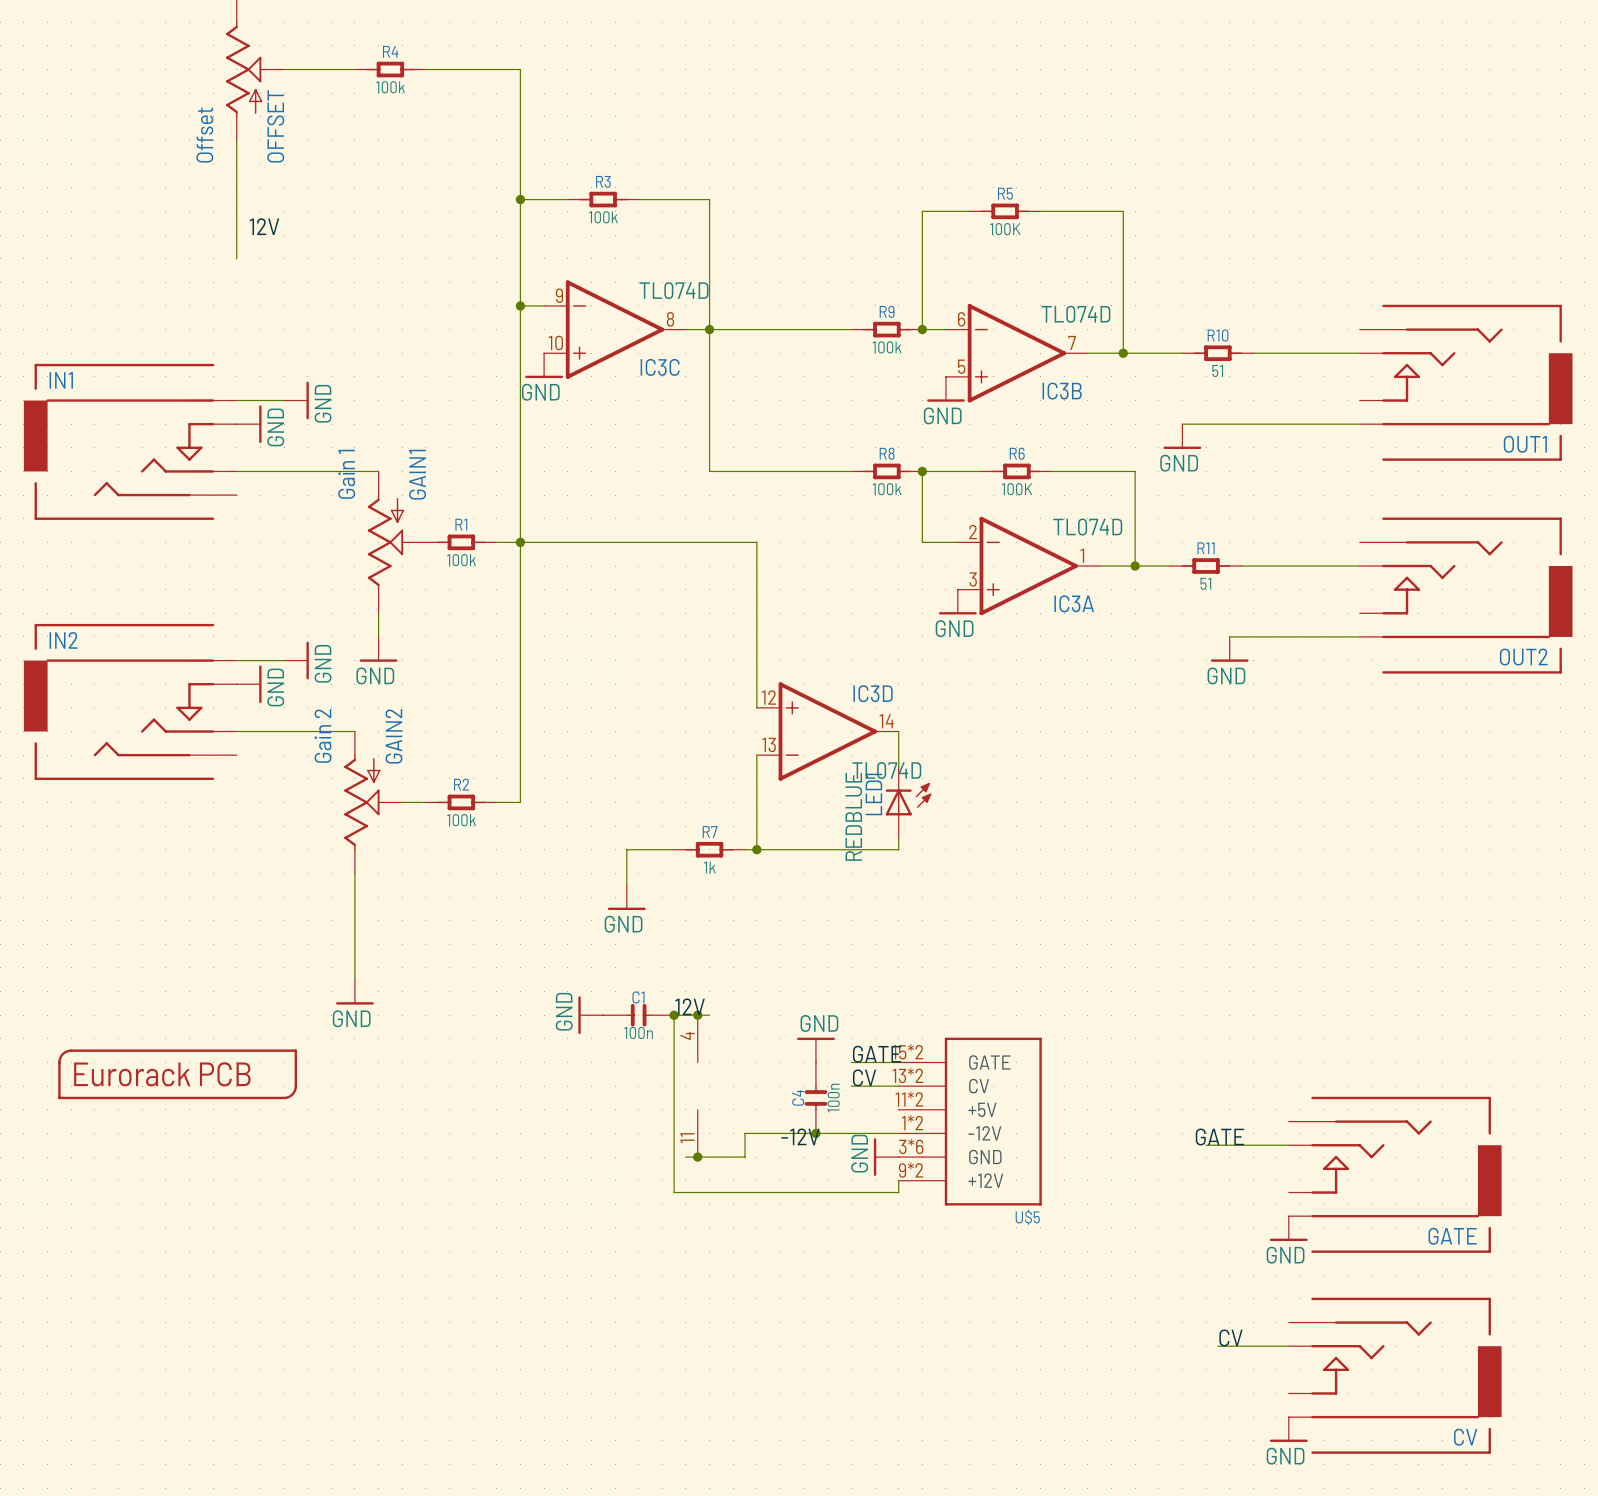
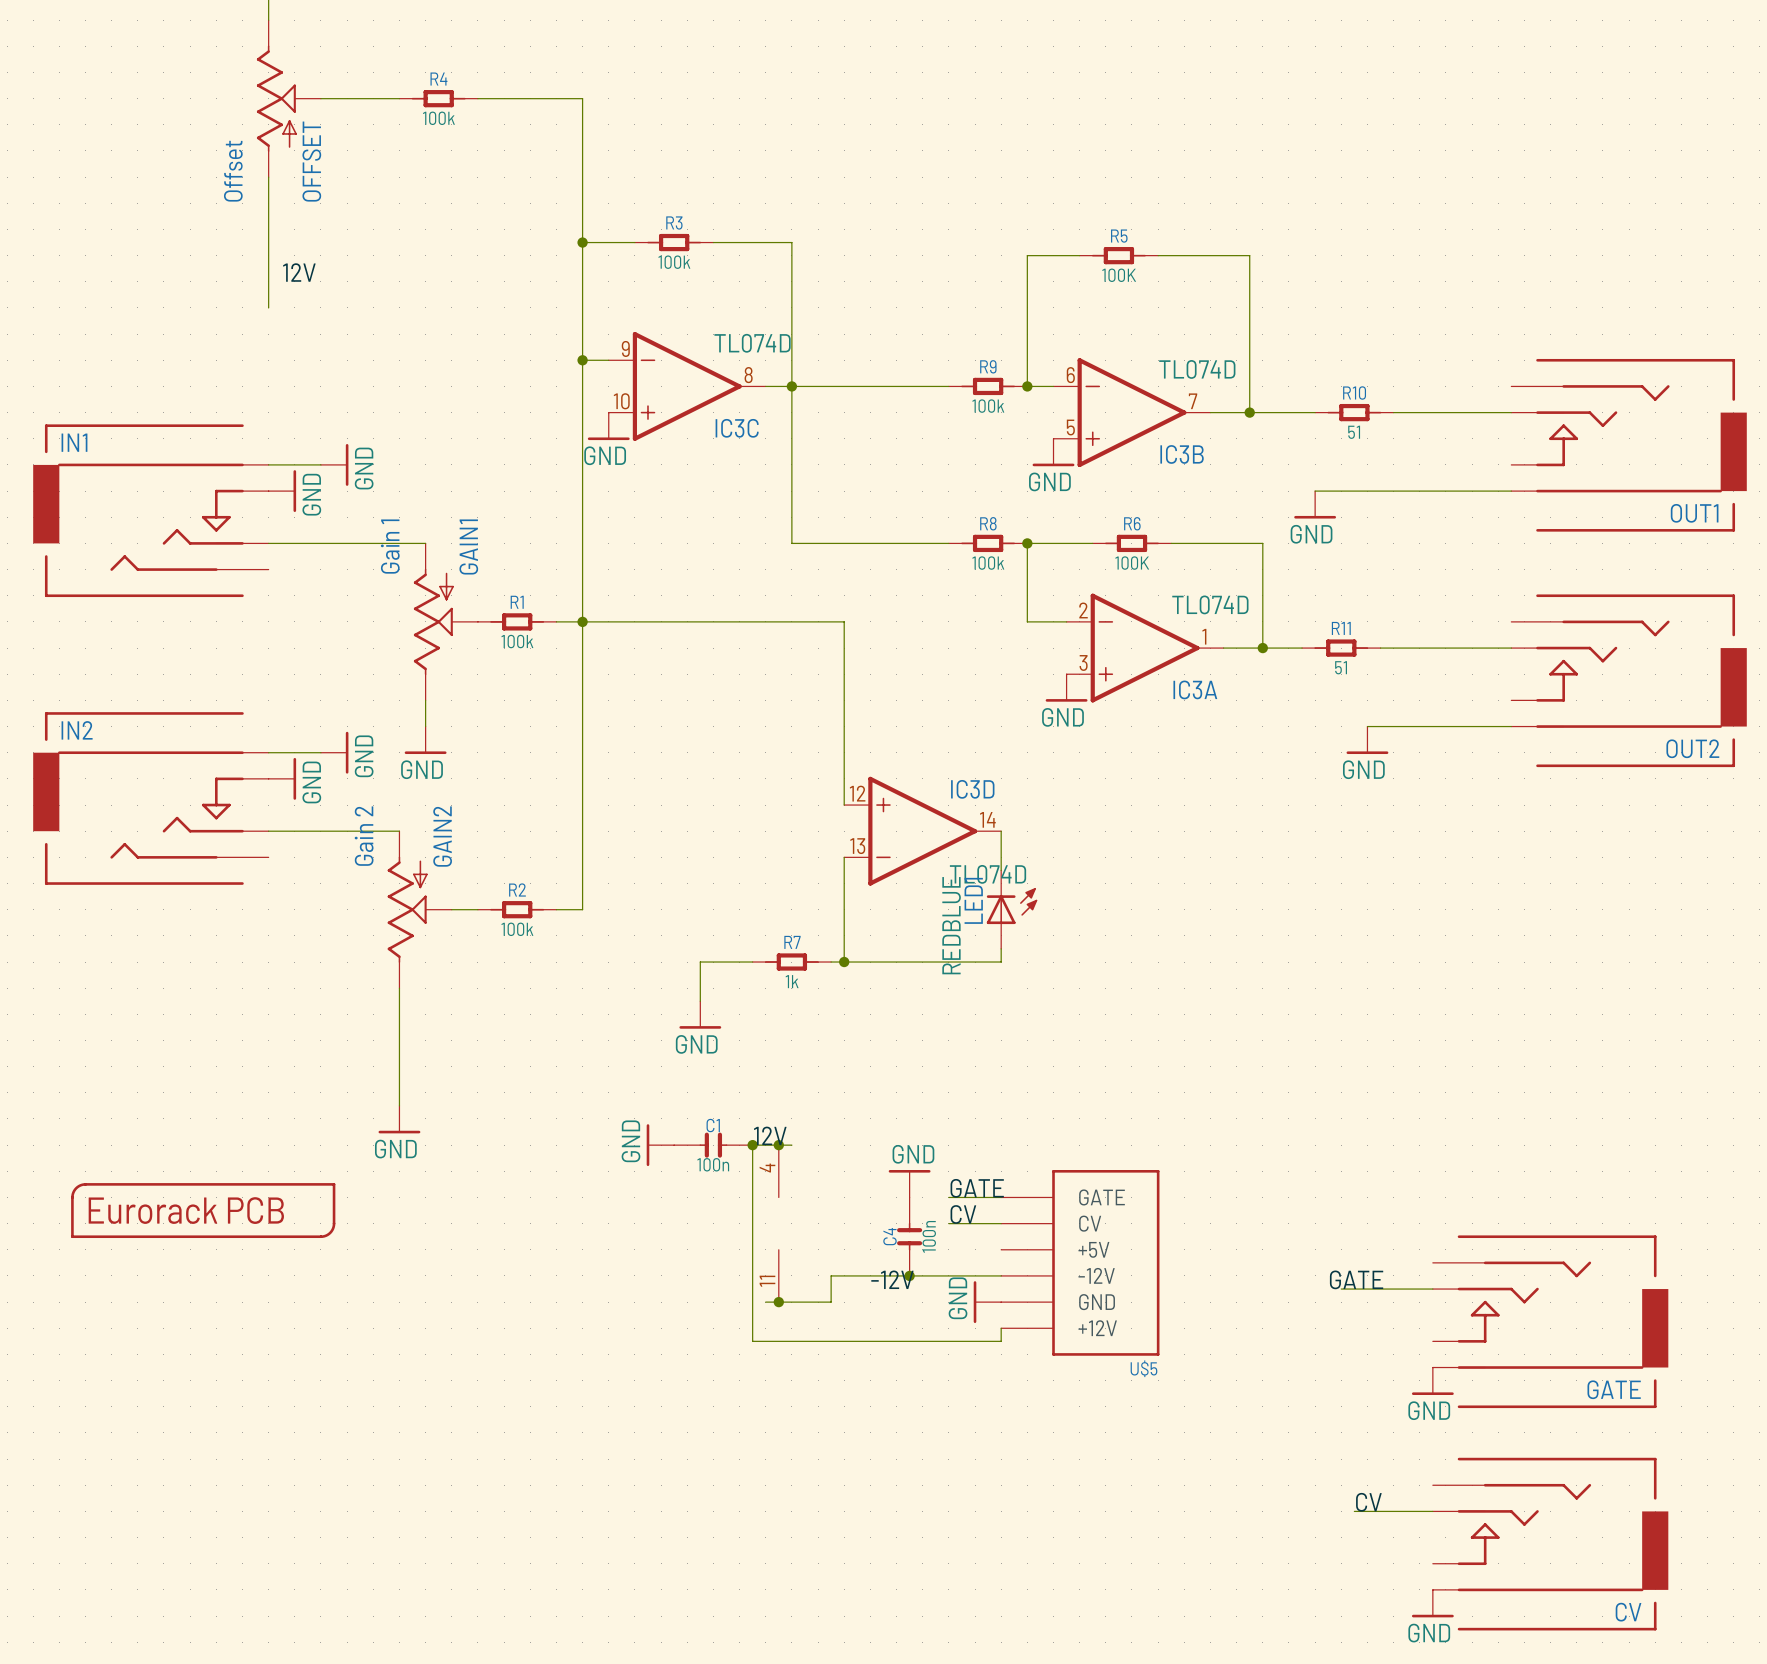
U$5 pin number: 15*2 (907, 1051) -> none
U$5 pin number: 13*2 (907, 1075) -> none
U$5 pin number: 11*2 (909, 1099) -> none
U$5 pin number: 1*2 (912, 1122) -> none
U$5 pin number: 3*6 (911, 1146) -> none
U$5 pin number: 9*2 (911, 1170) -> none

